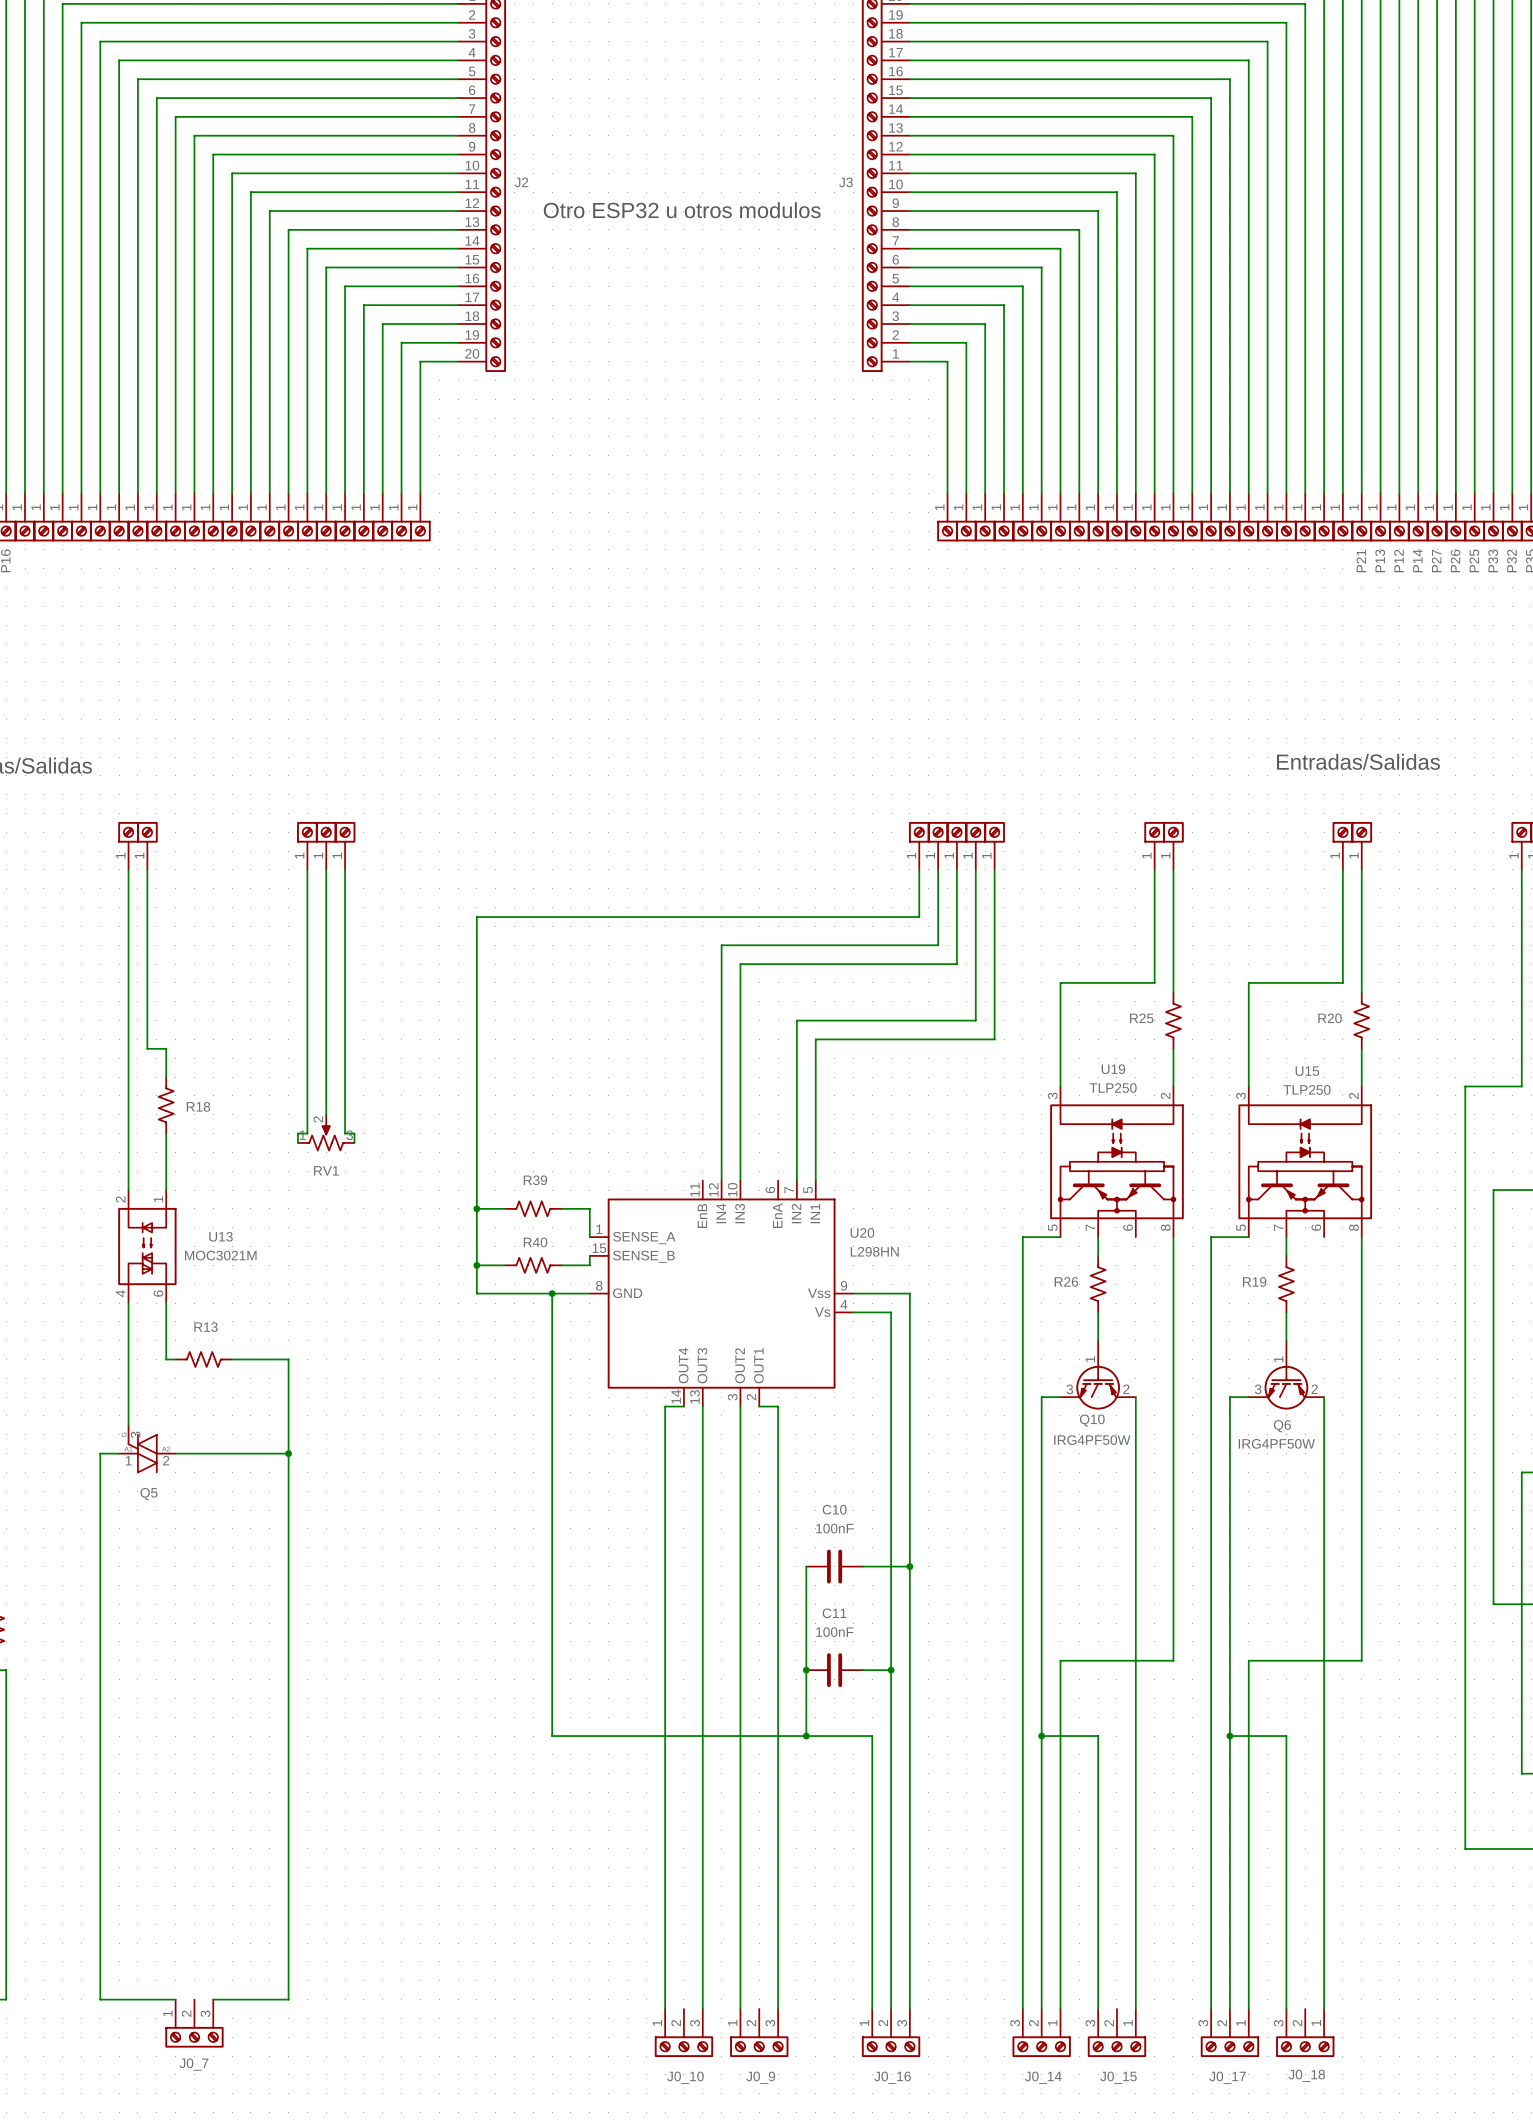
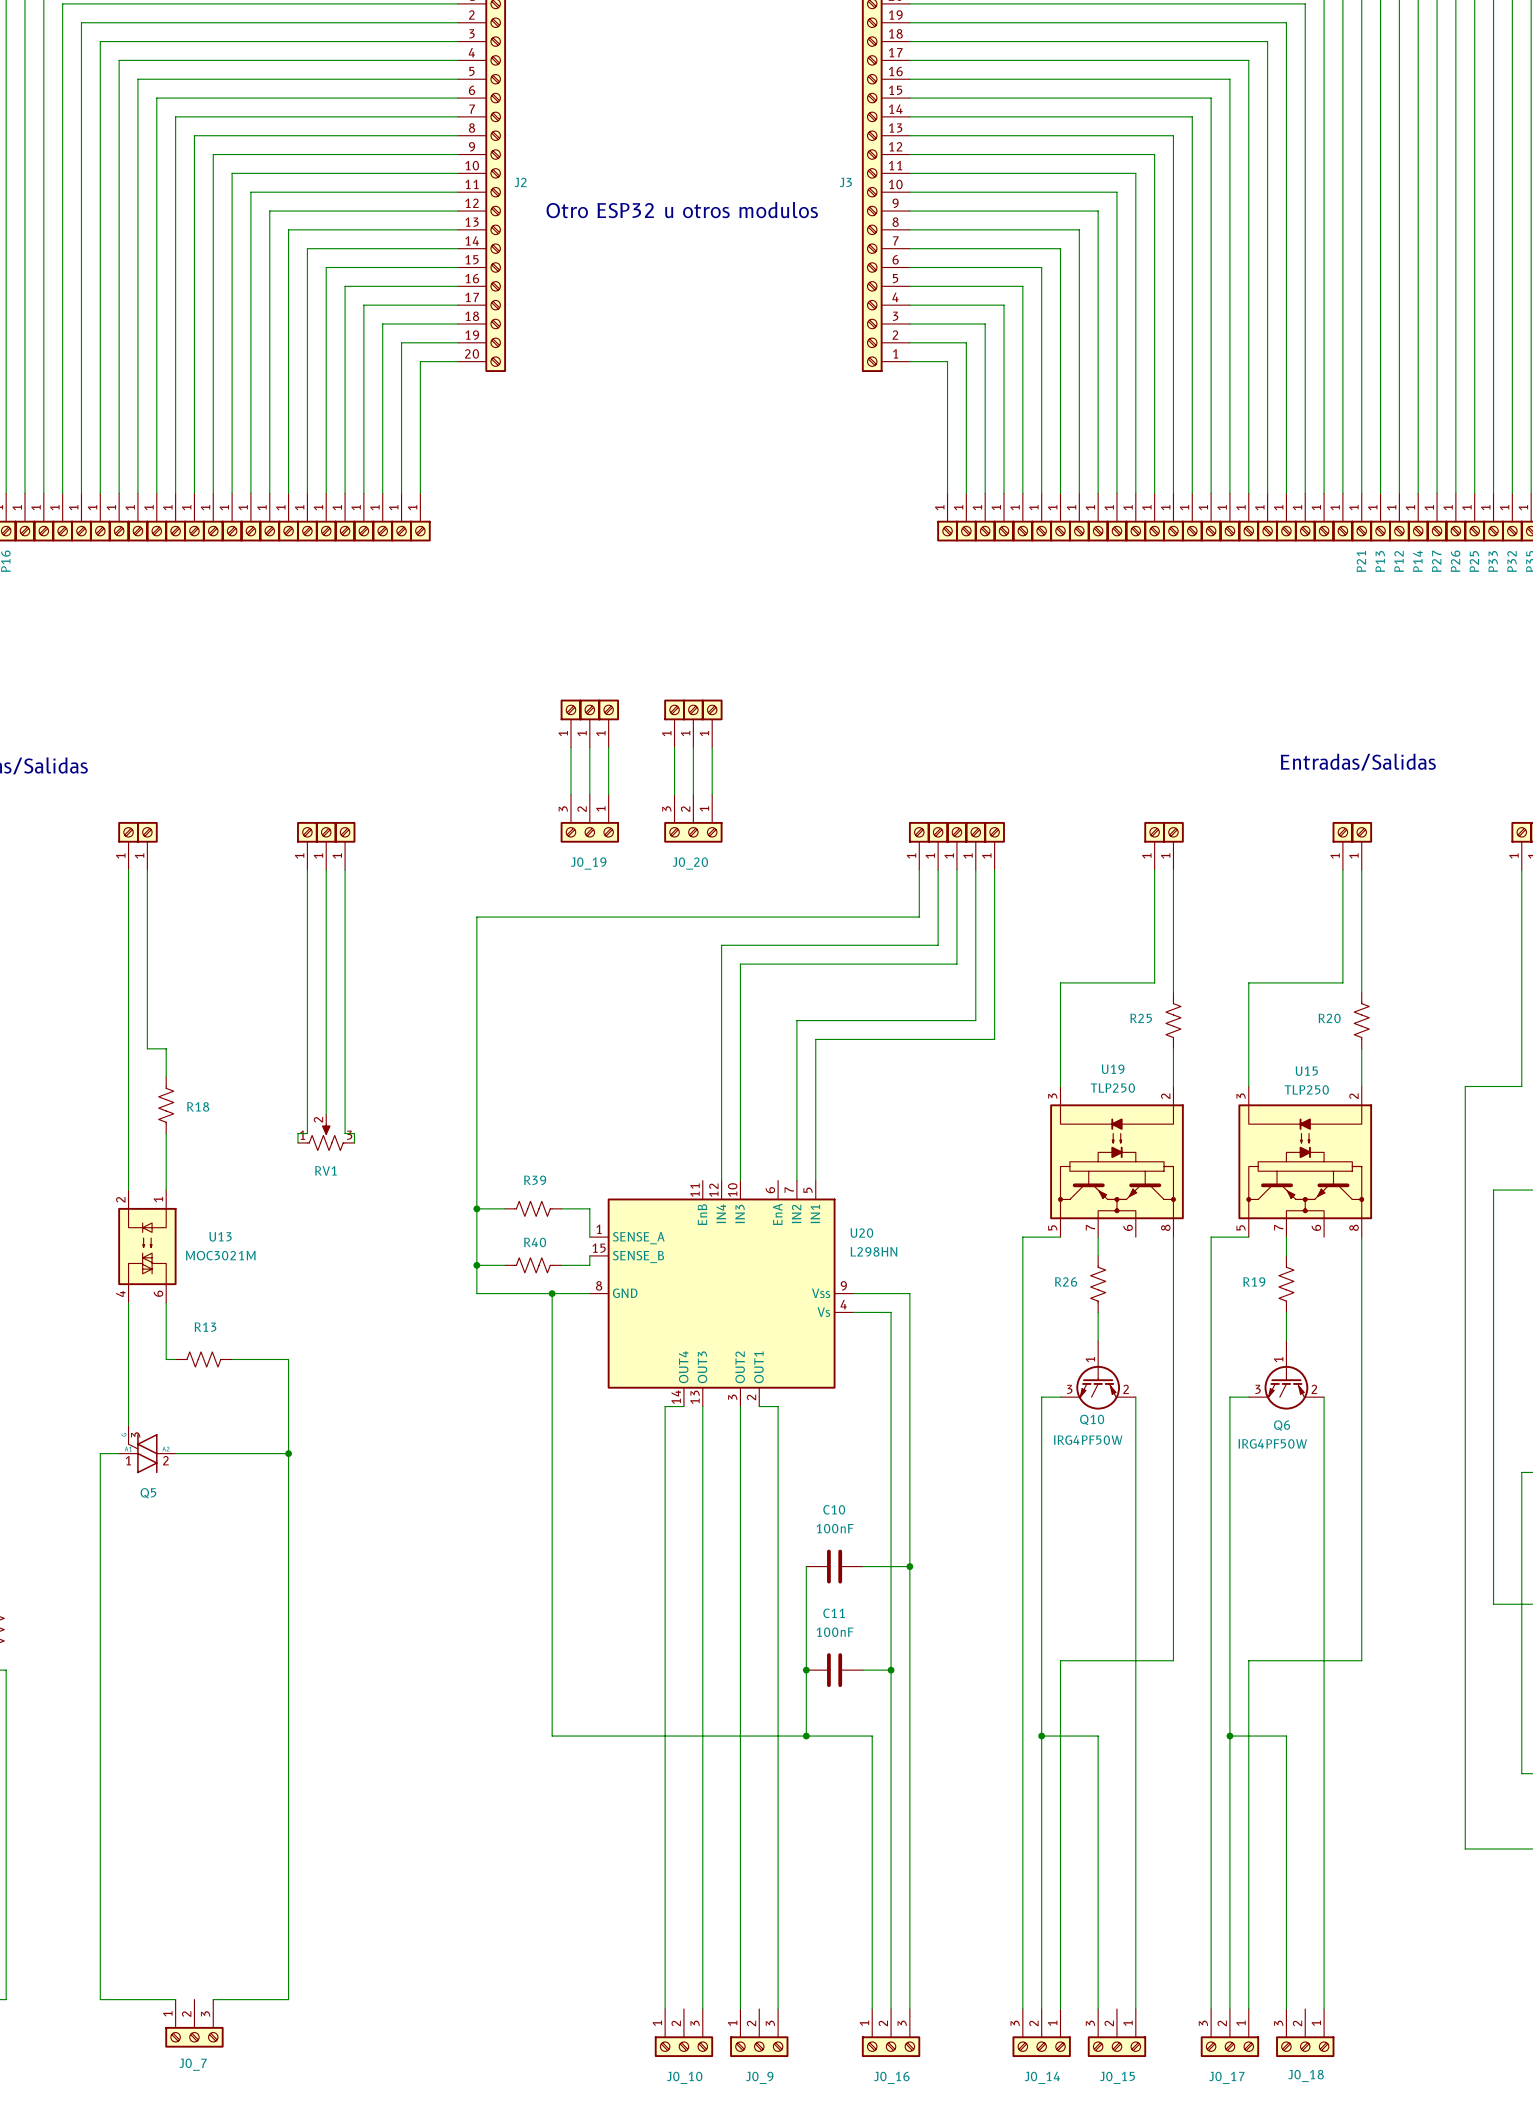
part: none -> (570, 723)
part: none -> (589, 723)
part: none -> (608, 723)
part: none -> (674, 723)
part: none -> (693, 723)
part: none -> (712, 723)
wire: none -> (570, 747) (570, 794)
wire: none -> (589, 747) (589, 794)
wire: none -> (608, 747) (608, 794)
wire: none -> (674, 747) (674, 794)
wire: none -> (693, 747) (693, 794)
wire: none -> (712, 747) (712, 794)
J0_19: none -> (589, 818)
J0_20: none -> (693, 818)

